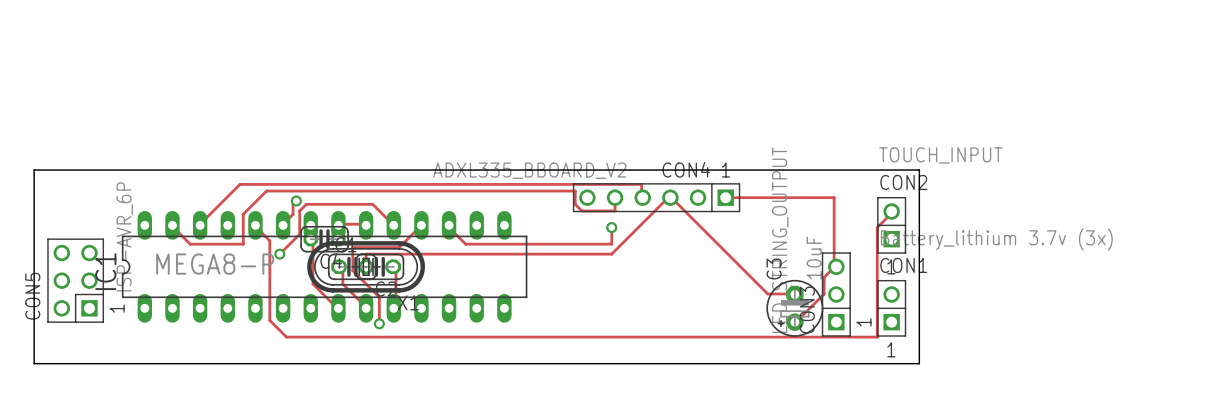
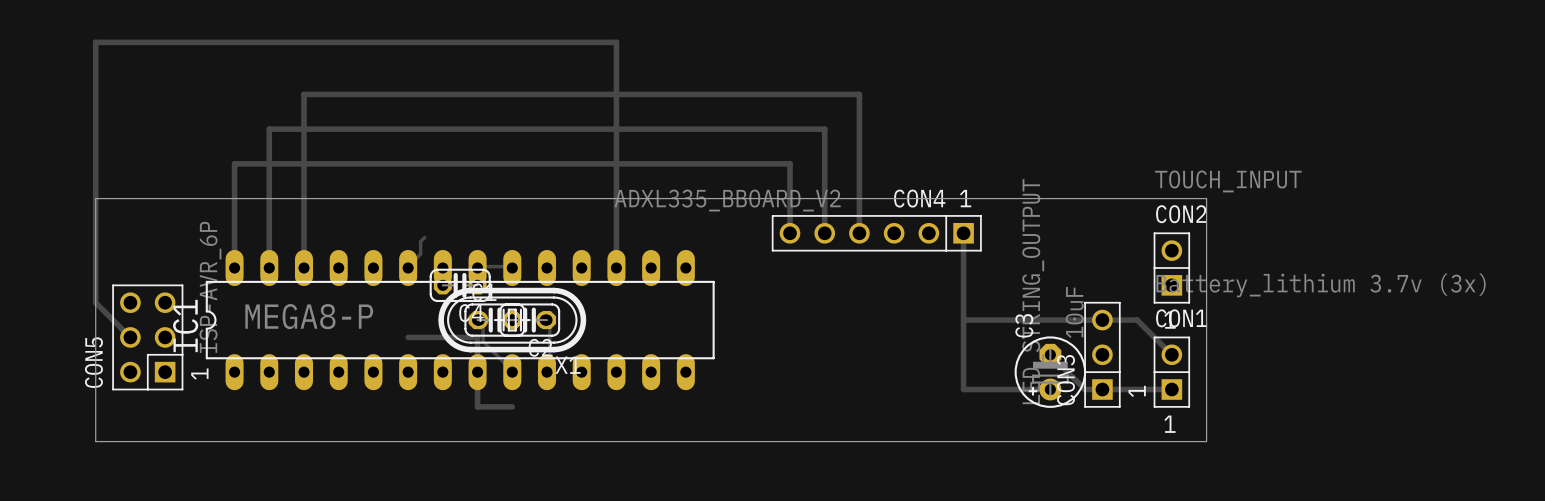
track: none -> (790, 233) (790, 163) (234, 163) (234, 268)
track: (615, 197) (615, 210) (581, 210) (575, 204) (575, 191) (266, 191) (243, 214) (243, 244) (190, 244) (172, 225) -> (824, 233) (824, 129) (269, 129) (269, 268)
track: (642, 197) (641, 184) (239, 184) (200, 224) -> (859, 233) (859, 94) (304, 94) (304, 266)
track: (725, 197) (834, 197) (834, 264) (836, 266) (824, 277) (824, 293) (794, 322) -> (963, 233) (963, 389) (1050, 389)
via: (296, 201) -> none
track: (891, 211) (877, 227) (877, 337) (286, 337) (269, 320) (269, 240) (255, 225) -> none
track: (310, 225) (312, 227) (312, 237) (310, 239) (312, 240) (312, 284) (338, 308) -> none
track: (393, 225) (372, 204) (306, 204) (299, 210) (299, 234) (279, 254) -> none
track: (421, 225) (399, 247) (352, 247) (352, 270) (379, 297) (379, 323) -> none
track: (449, 225) (465, 244) (611, 244) (611, 227) -> (616, 268) (616, 42) (95, 42) (95, 302) (130, 337)
via: (611, 227) -> none
via: (279, 254) -> none
track: (366, 266) (366, 254) (611, 254) (668, 197) (671, 197) (767, 293) (794, 294) -> (1171, 389) (1085, 389) (1050, 354)
track: none -> (963, 320) (1137, 320) (1171, 354)
track: none -> (408, 337) (477, 337) (477, 406) (512, 406)
via: (379, 323) -> none

